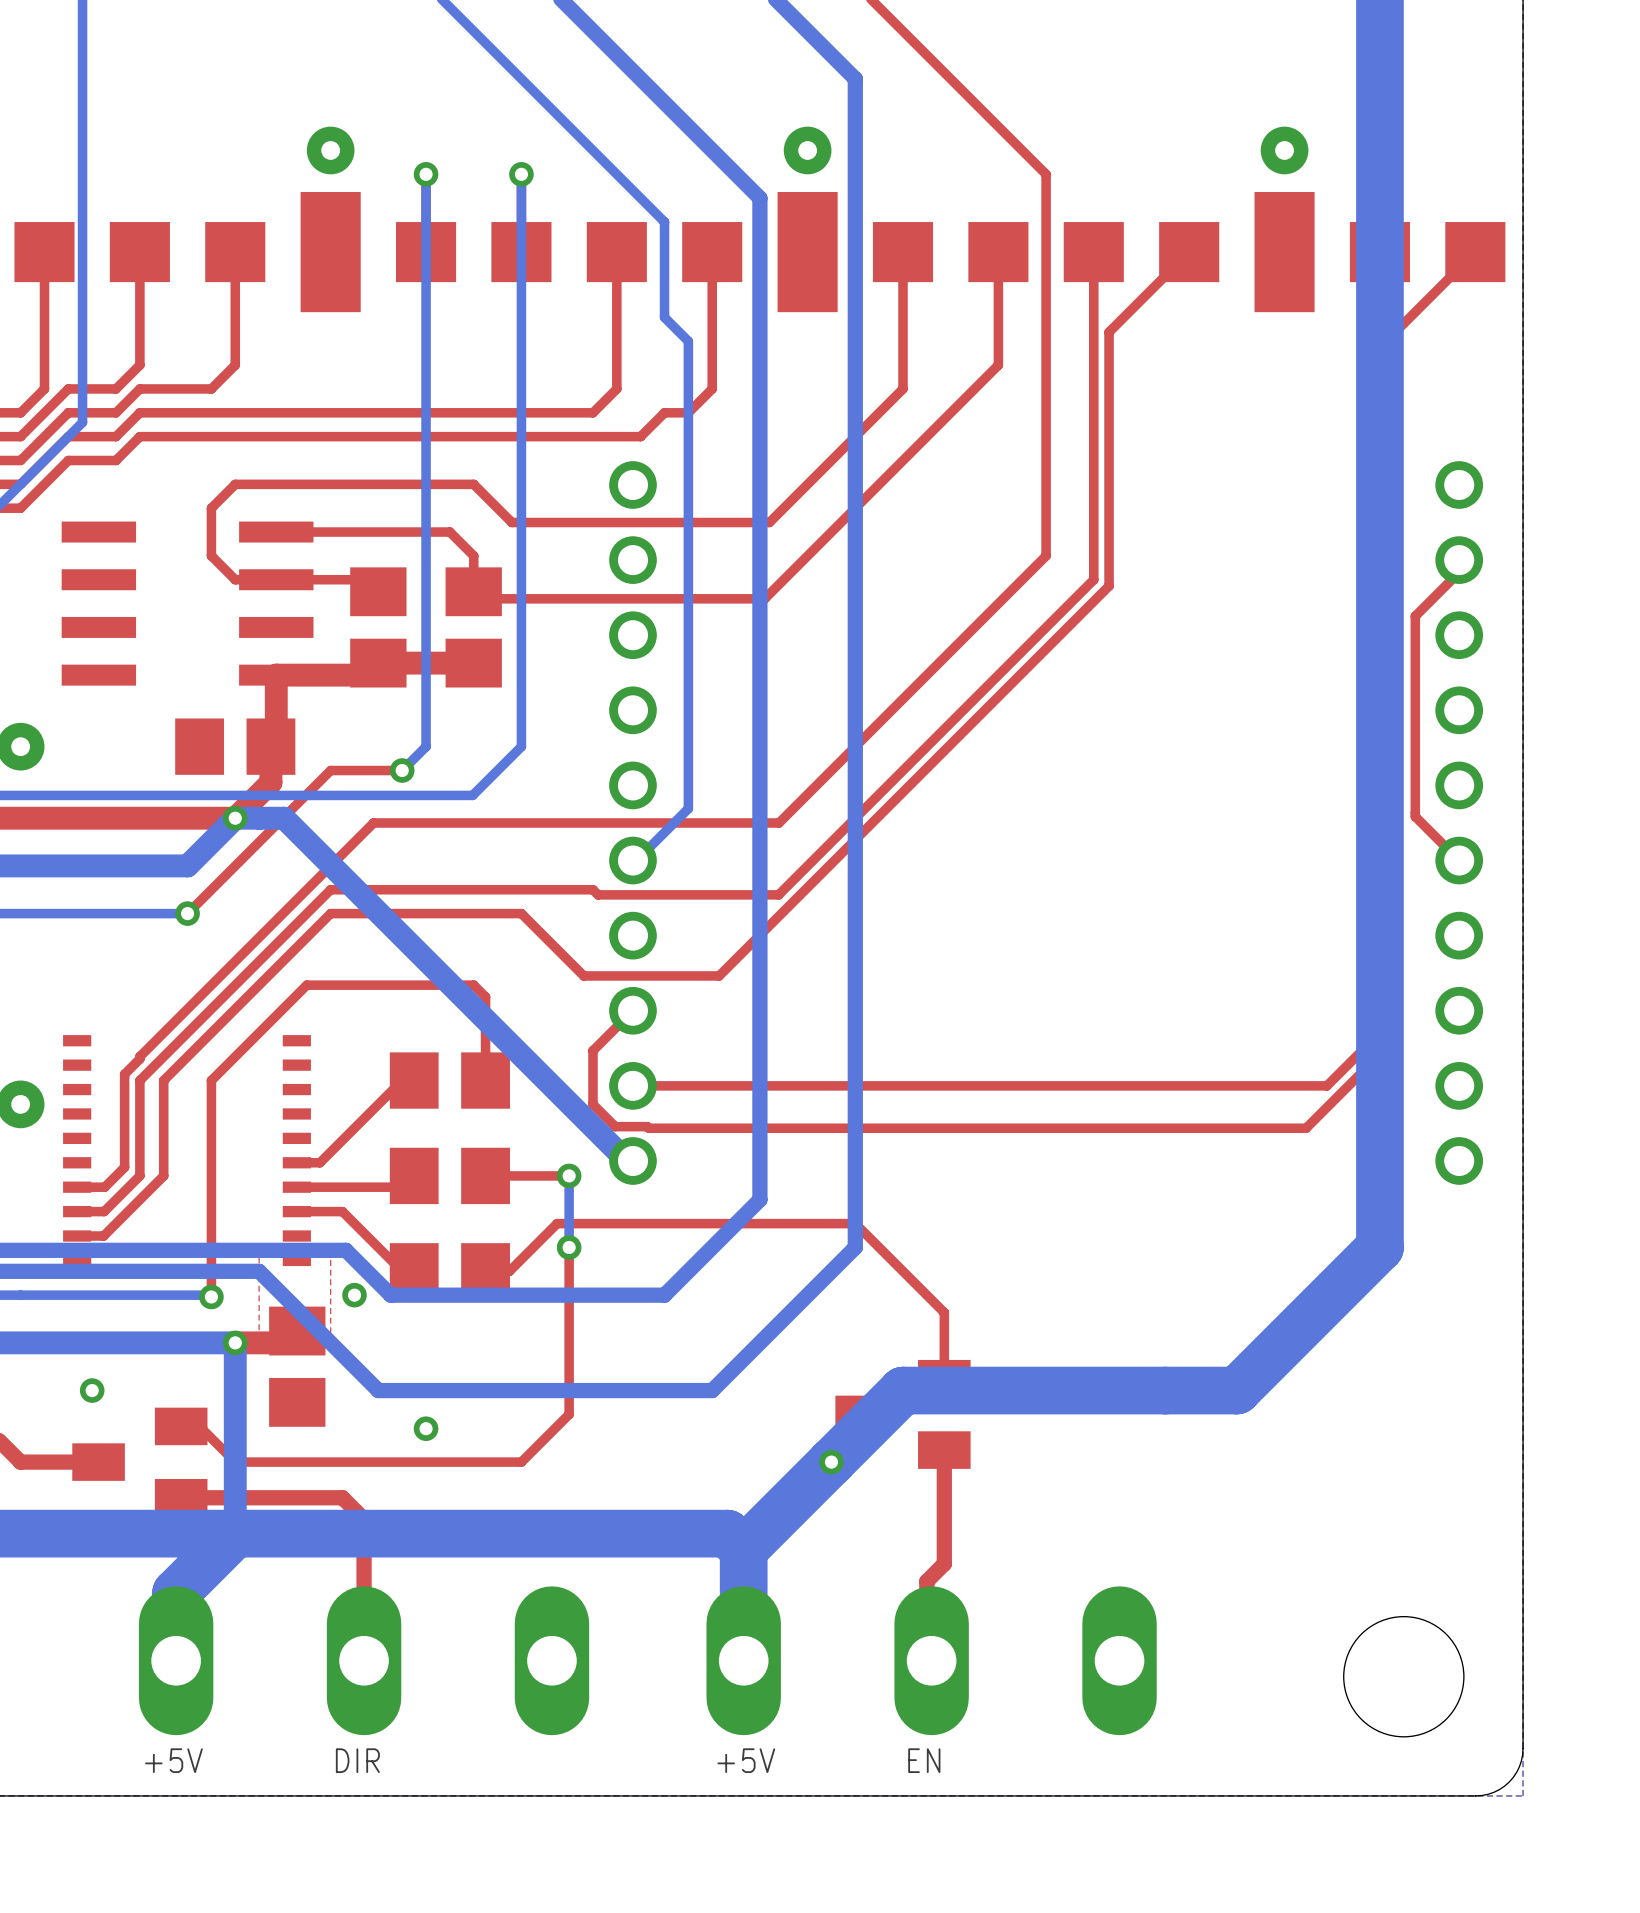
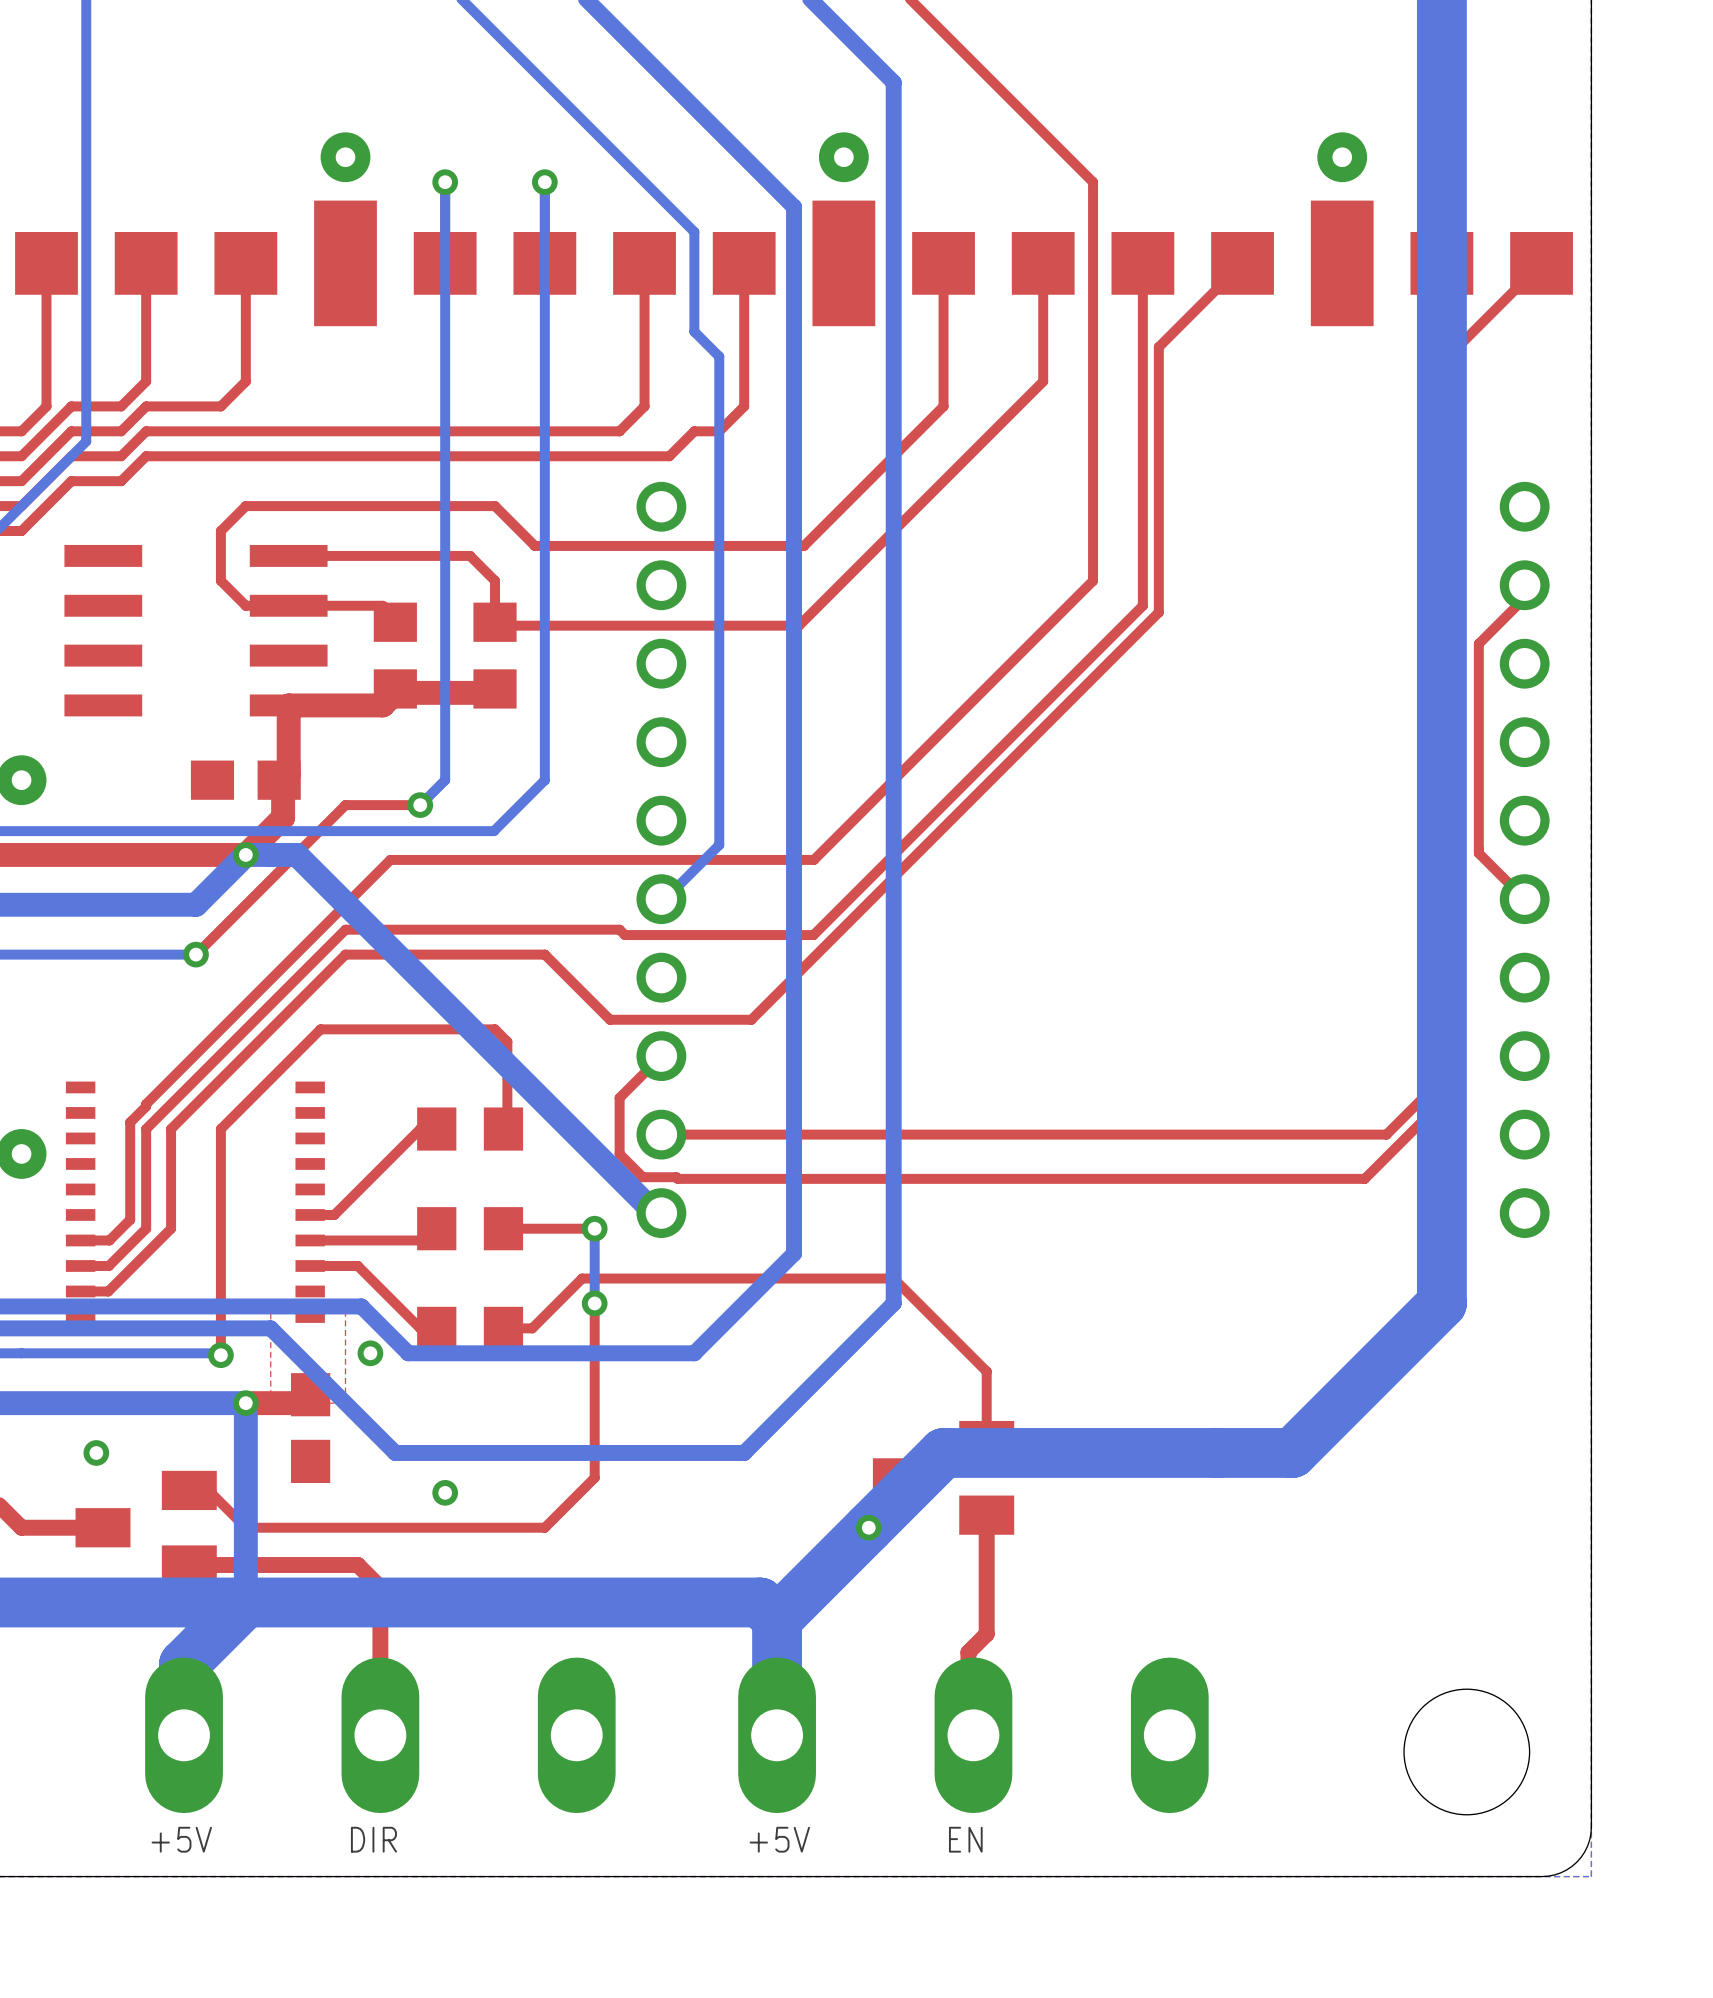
part footprint: [350, 567, 407, 688] -> [373, 602, 417, 709]
part footprint: [445, 567, 502, 688] -> [473, 602, 517, 709]
part footprint: [175, 718, 296, 775] -> [190, 760, 301, 800]
part footprint: [389, 1052, 510, 1109] -> [417, 1107, 524, 1151]
part footprint: [389, 1147, 510, 1205] -> [417, 1207, 524, 1251]
part footprint: [389, 1243, 510, 1300] -> [417, 1306, 524, 1350]
part footprint: [269, 1306, 326, 1427] -> [291, 1373, 331, 1483]

